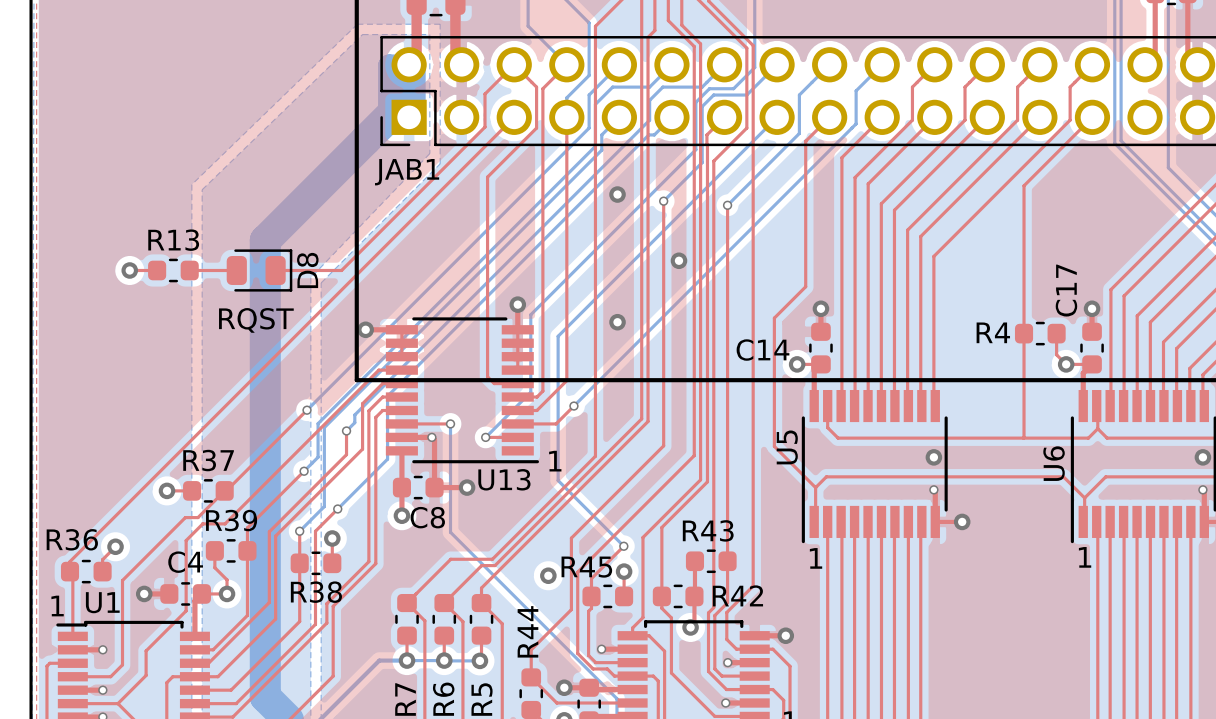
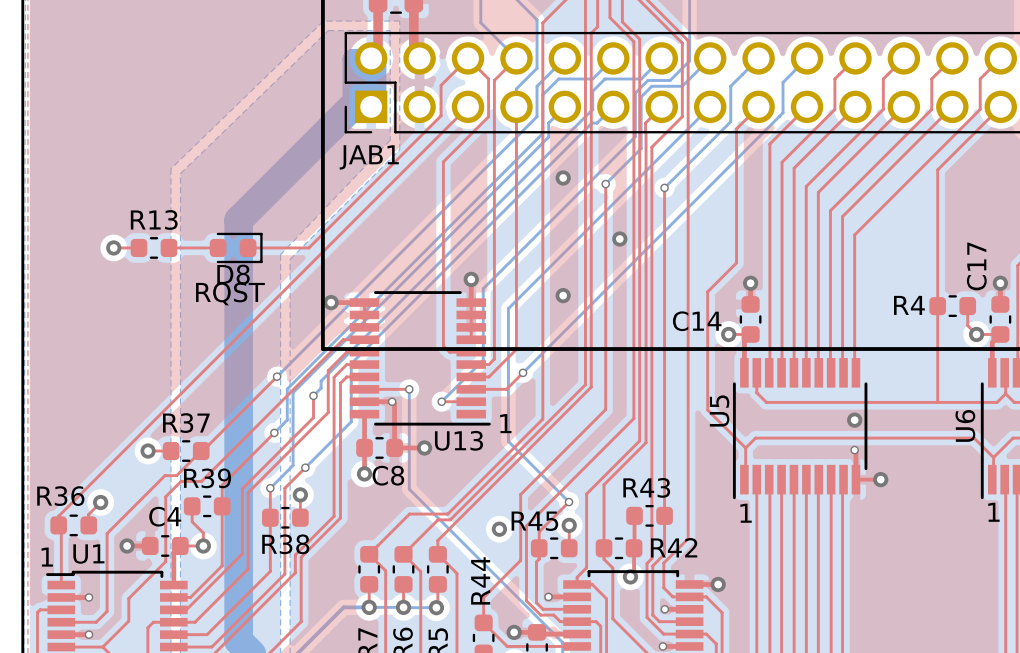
D8 footprint: [226, 249, 293, 292] -> [209, 232, 263, 264]
D8 name rotation: 0° (307, 270) -> 90° clockwise (233, 274)
D8 name position: D8 (307, 270) -> D8 (233, 274)

